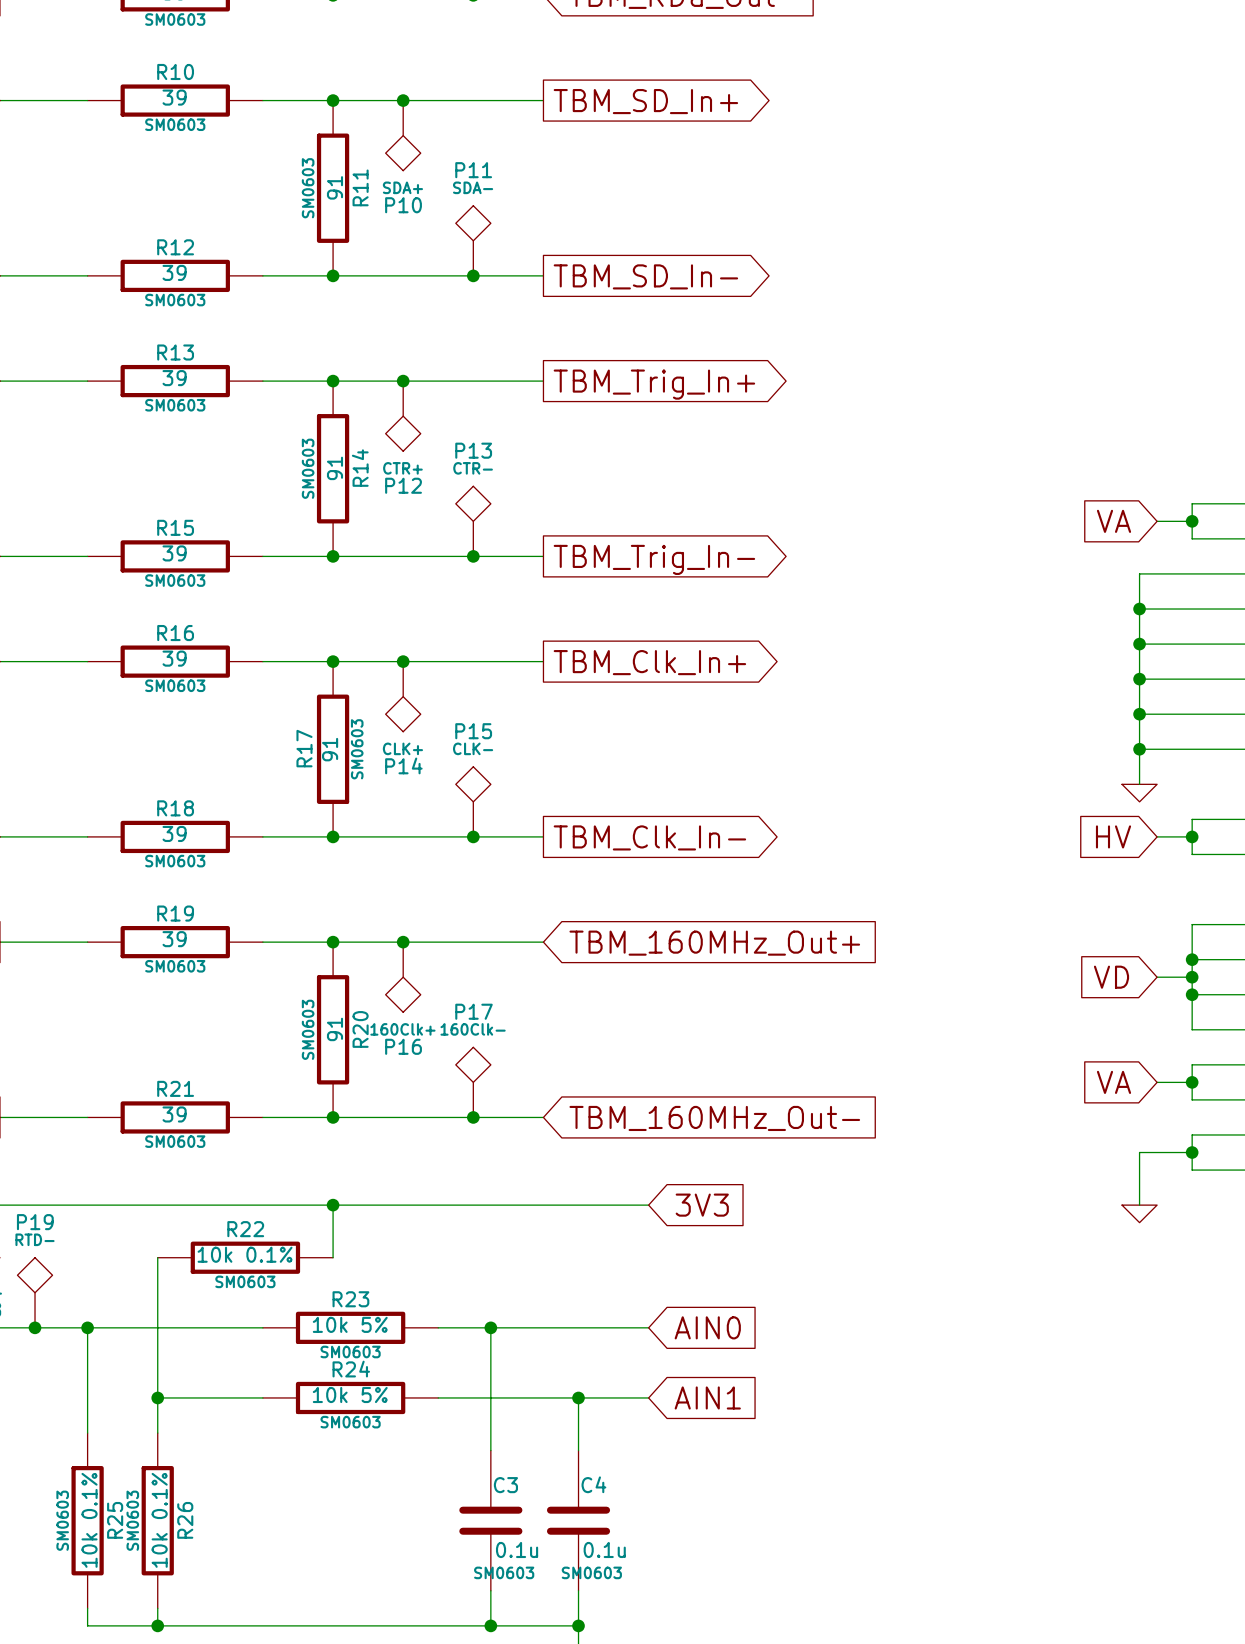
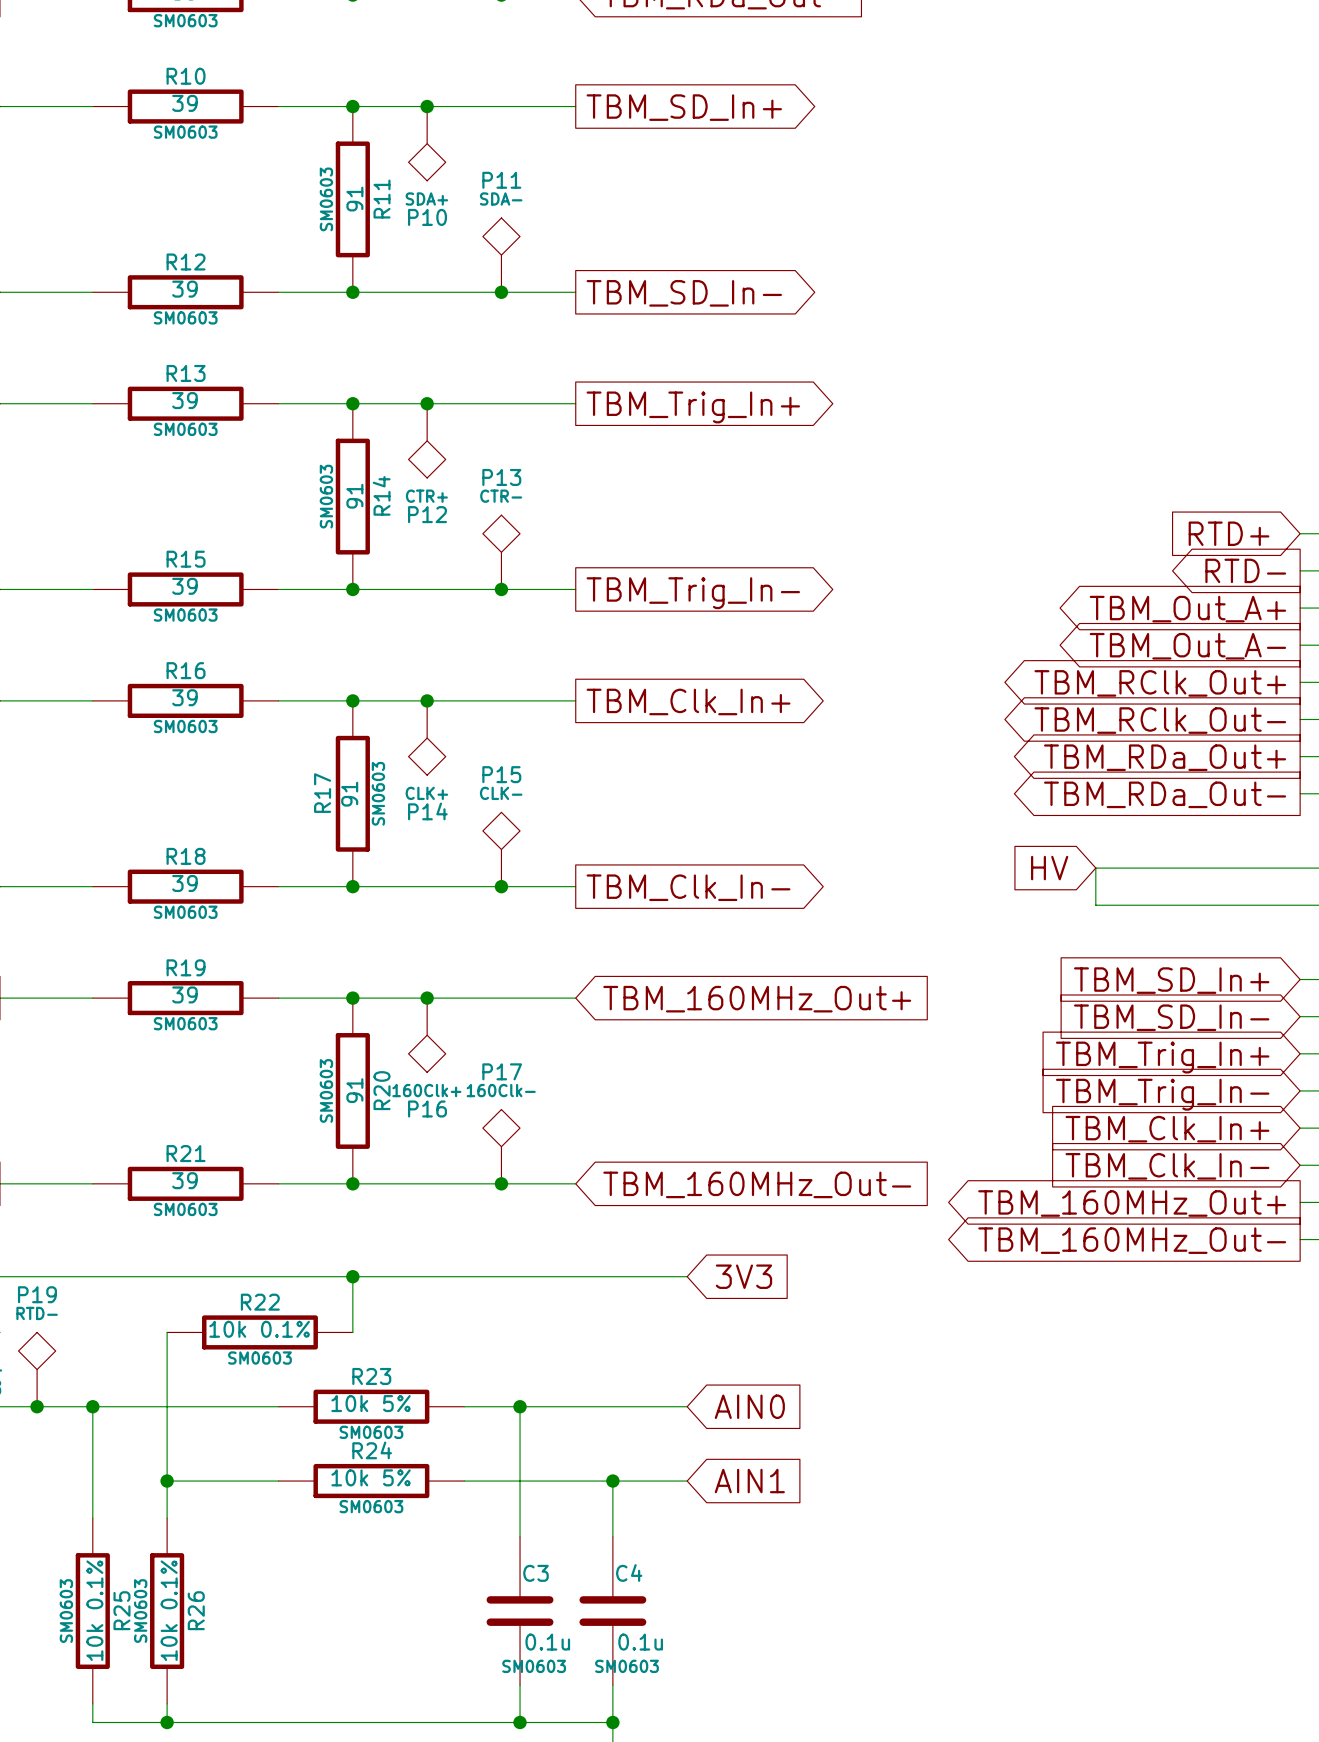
global label: none -> RTD+ (1229, 533)
wire: (1227, 503) (1192, 503) (1192, 538) (1227, 538) -> none
global label: VA (1114, 521) -> none
wire: (1157, 521) (1192, 521) -> none
junction: (1192, 521) -> none
global label: none -> RTD- (1245, 570)
wire: (1227, 573) (1139, 573) (1139, 784) -> none
global label: none -> TBM_Out_A+ (1187, 609)
wire: (1139, 609) (1227, 609) -> none
junction: (1139, 609) -> none
global label: none -> TBM_Out_A- (1187, 646)
wire: (1139, 644) (1227, 644) -> none
junction: (1139, 644) -> none
global label: none -> TBM_RClk_Out+ (1160, 683)
wire: (1139, 679) (1227, 679) -> none
junction: (1139, 679) -> none
global label: none -> TBM_RClk_Out- (1160, 720)
wire: (1139, 714) (1227, 714) -> none
junction: (1139, 714) -> none
global label: none -> TBM_RDa_Out+ (1165, 757)
wire: (1139, 749) (1227, 749) -> none
junction: (1139, 749) -> none
global label: none -> TBM_RDa_Out- (1165, 794)
power symbol: (1139, 793) -> none
wire: (1192, 819) (1192, 854) -> (1262, 868) (1095, 868) (1095, 905) (1262, 905)
global label position: HV (1113, 836) -> HV (1049, 868)
wire: (1157, 836) (1192, 836) -> none
junction: (1192, 836) -> none
wire: (1227, 924) (1192, 924) (1192, 1029) (1227, 1029) -> none
global label: none -> TBM_SD_In+ (1171, 980)
wire: (1192, 959) (1227, 959) -> none
junction: (1192, 959) -> none
global label: none -> TBM_SD_In- (1171, 1017)
global label: VD (1111, 977) -> none
wire: (1157, 977) (1192, 977) -> none
junction: (1192, 977) -> none
wire: (1192, 994) (1227, 994) -> none
junction: (1192, 994) -> none
global label: none -> TBM_Trig_In+ (1162, 1057)
global label: none -> TBM_Trig_In- (1162, 1094)
wire: (1227, 1064) (1192, 1064) (1192, 1099) (1227, 1099) -> none
global label: none -> TBM_Clk_In+ (1167, 1129)
global label: VA (1114, 1082) -> none
wire: (1157, 1082) (1192, 1082) -> none
junction: (1192, 1082) -> none
global label: none -> TBM_Clk_In- (1167, 1166)
wire: (1227, 1134) (1192, 1134) (1192, 1170) (1227, 1170) -> none
global label: none -> TBM_160MHz_Out+ (1132, 1203)
wire: (1192, 1152) (1139, 1152) (1139, 1205) -> none
junction: (1192, 1152) -> none
global label: none -> TBM_160MHz_Out- (1132, 1240)
power symbol: (1139, 1213) -> none

